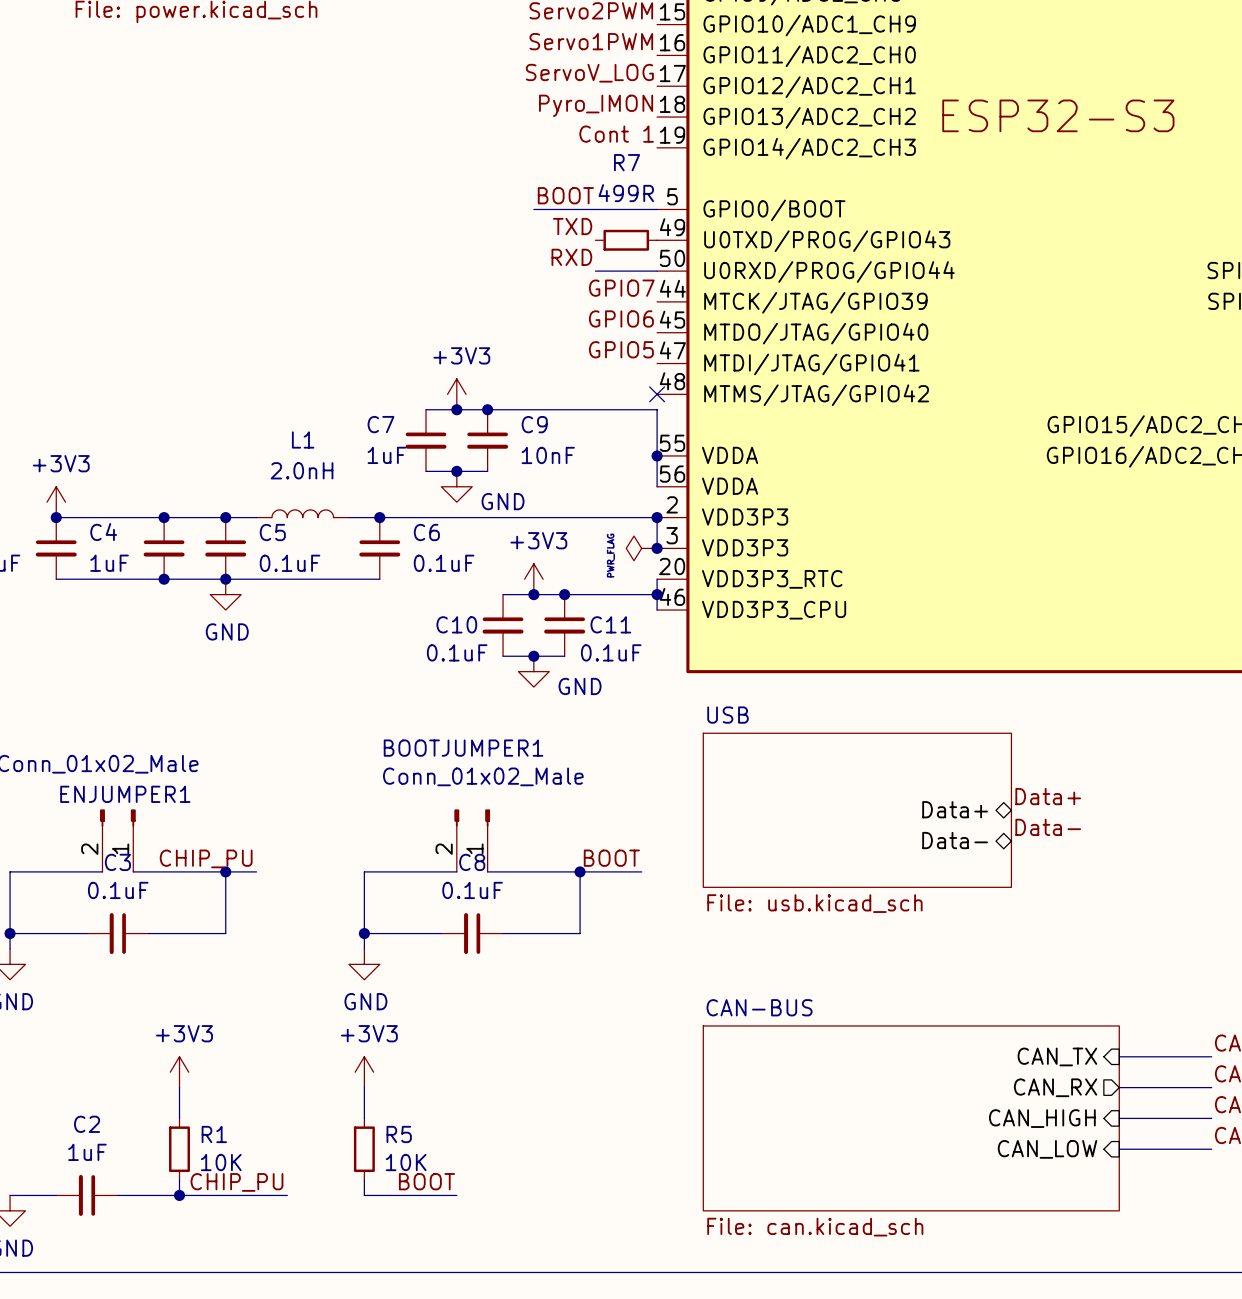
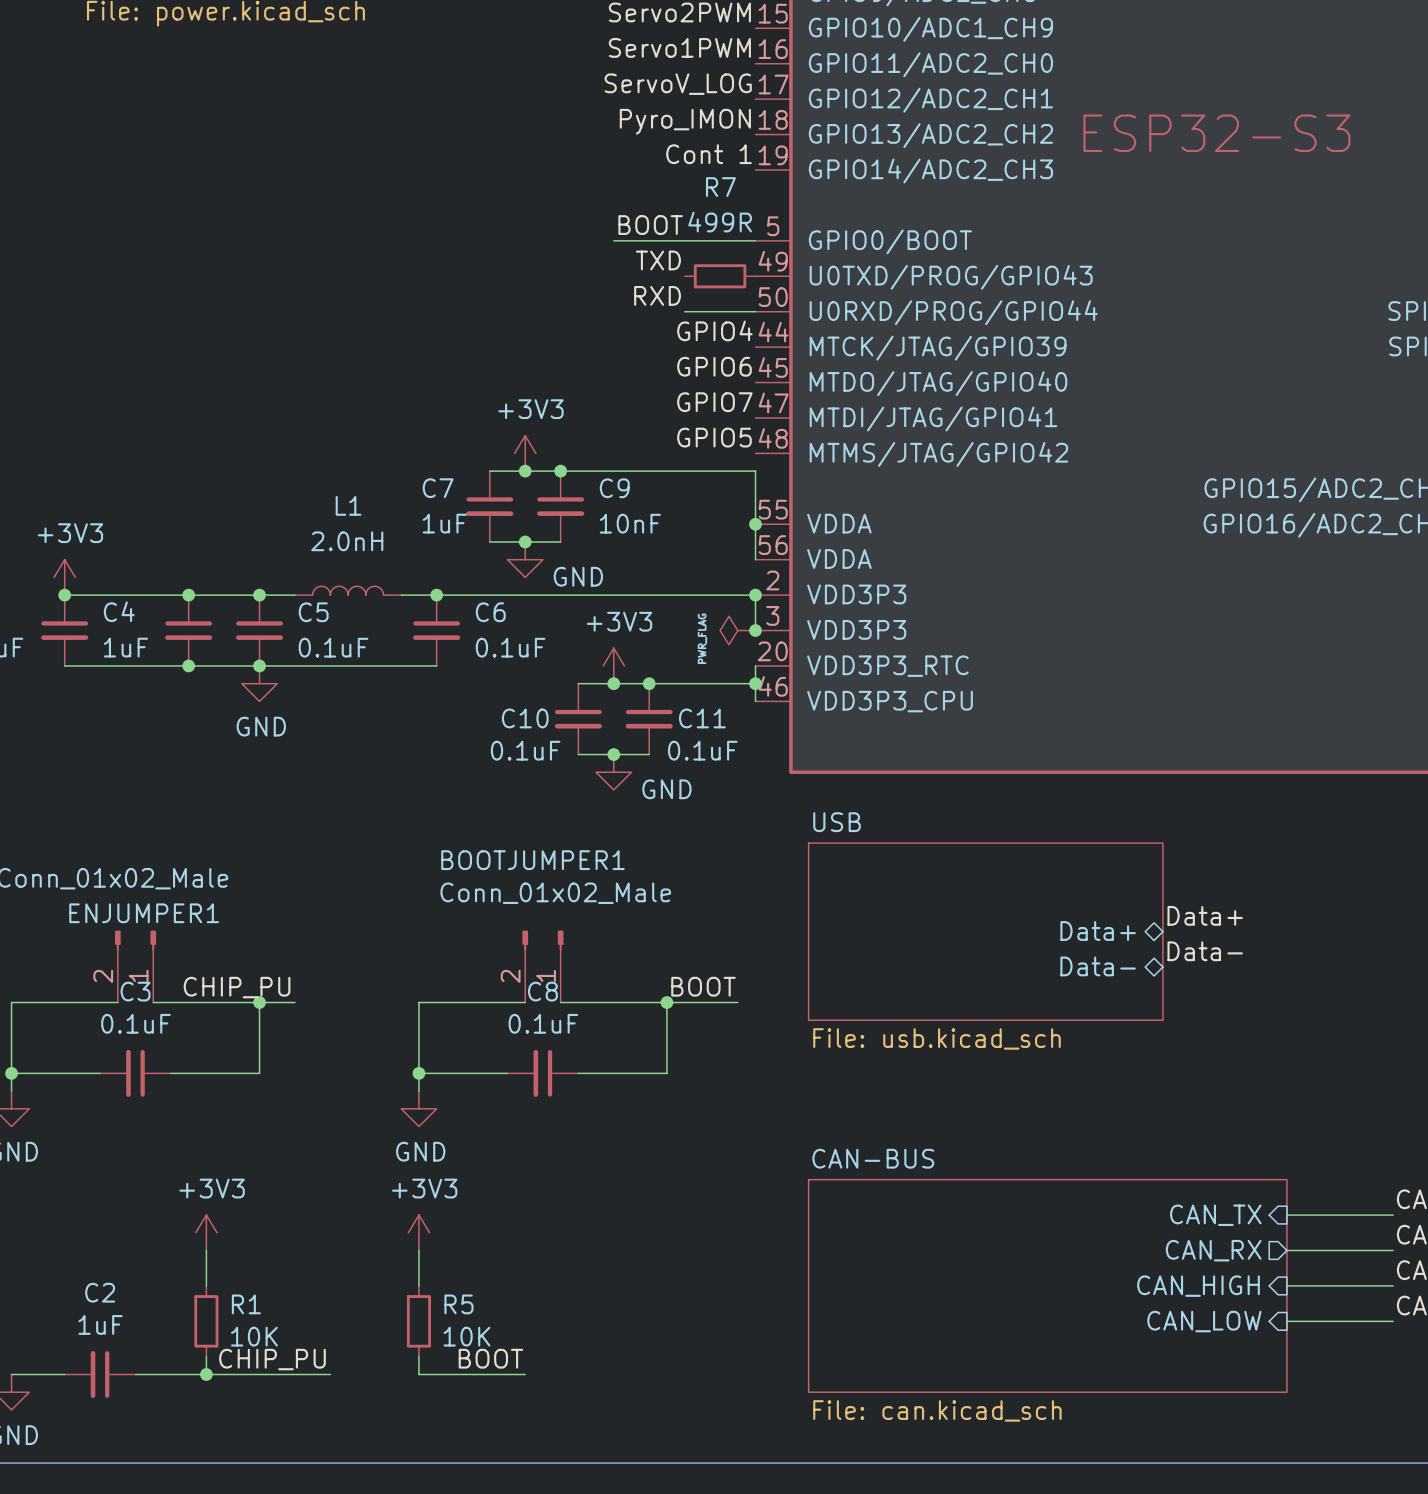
label: GPIO7 (621, 288) -> GPIO4 (714, 330)
label: GPIO5 (621, 349) -> GPIO7 (714, 402)
label: none -> GPIO5 (714, 437)
no-connect mark: (657, 394) -> none

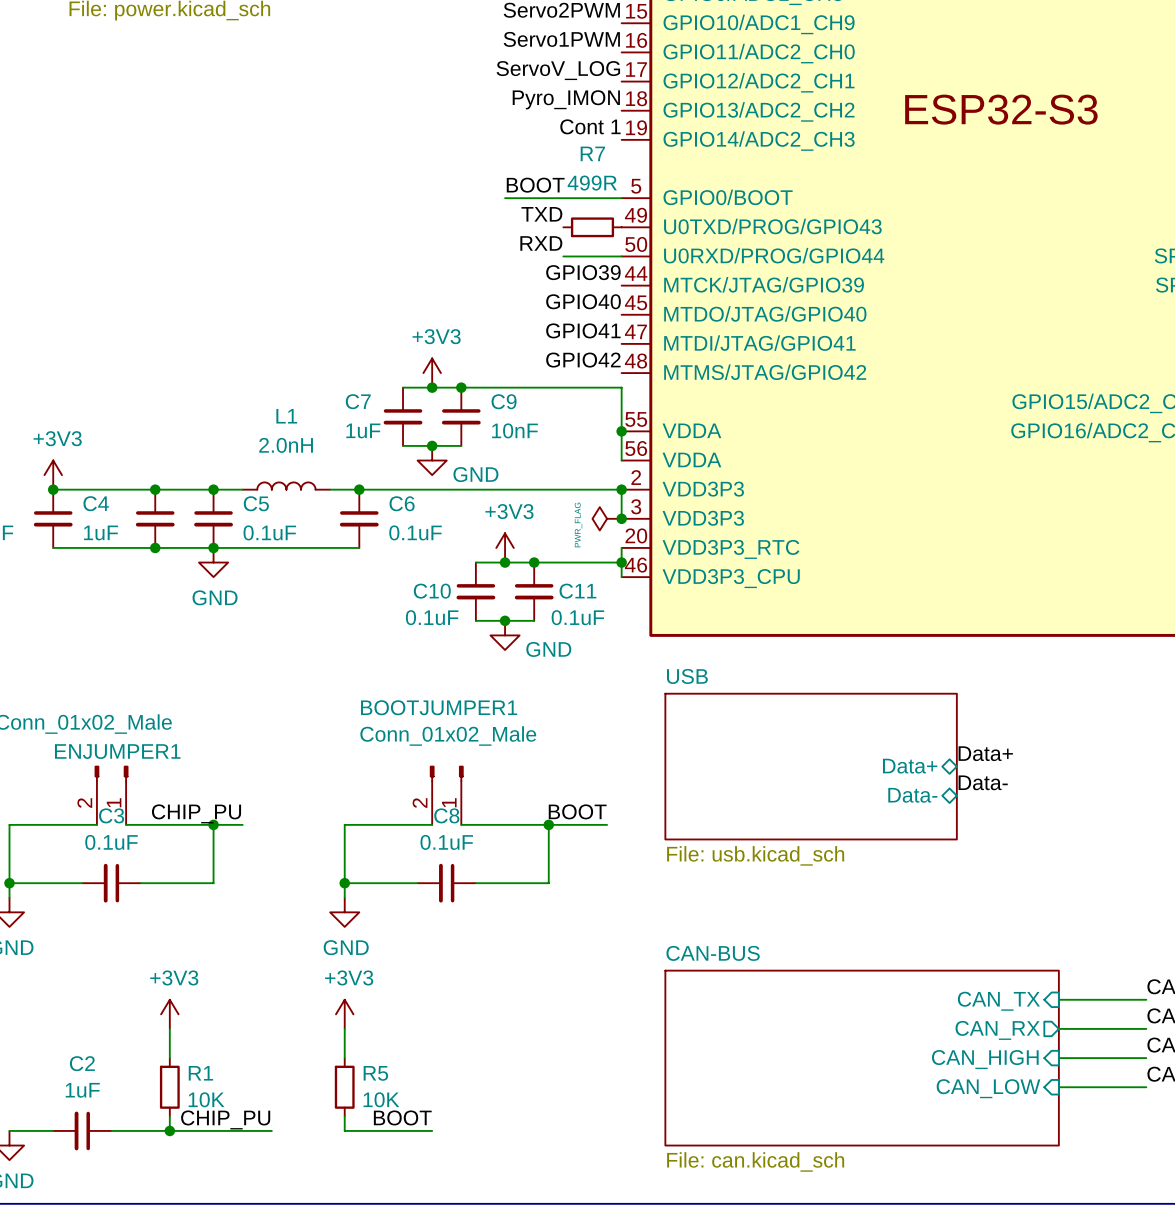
label: GPIO4 (714, 330) -> GPIO39 (583, 272)
label: GPIO6 (714, 366) -> GPIO40 (583, 301)
label: GPIO7 (714, 402) -> GPIO41 (583, 330)
label: GPIO5 (714, 437) -> GPIO42 (583, 360)

